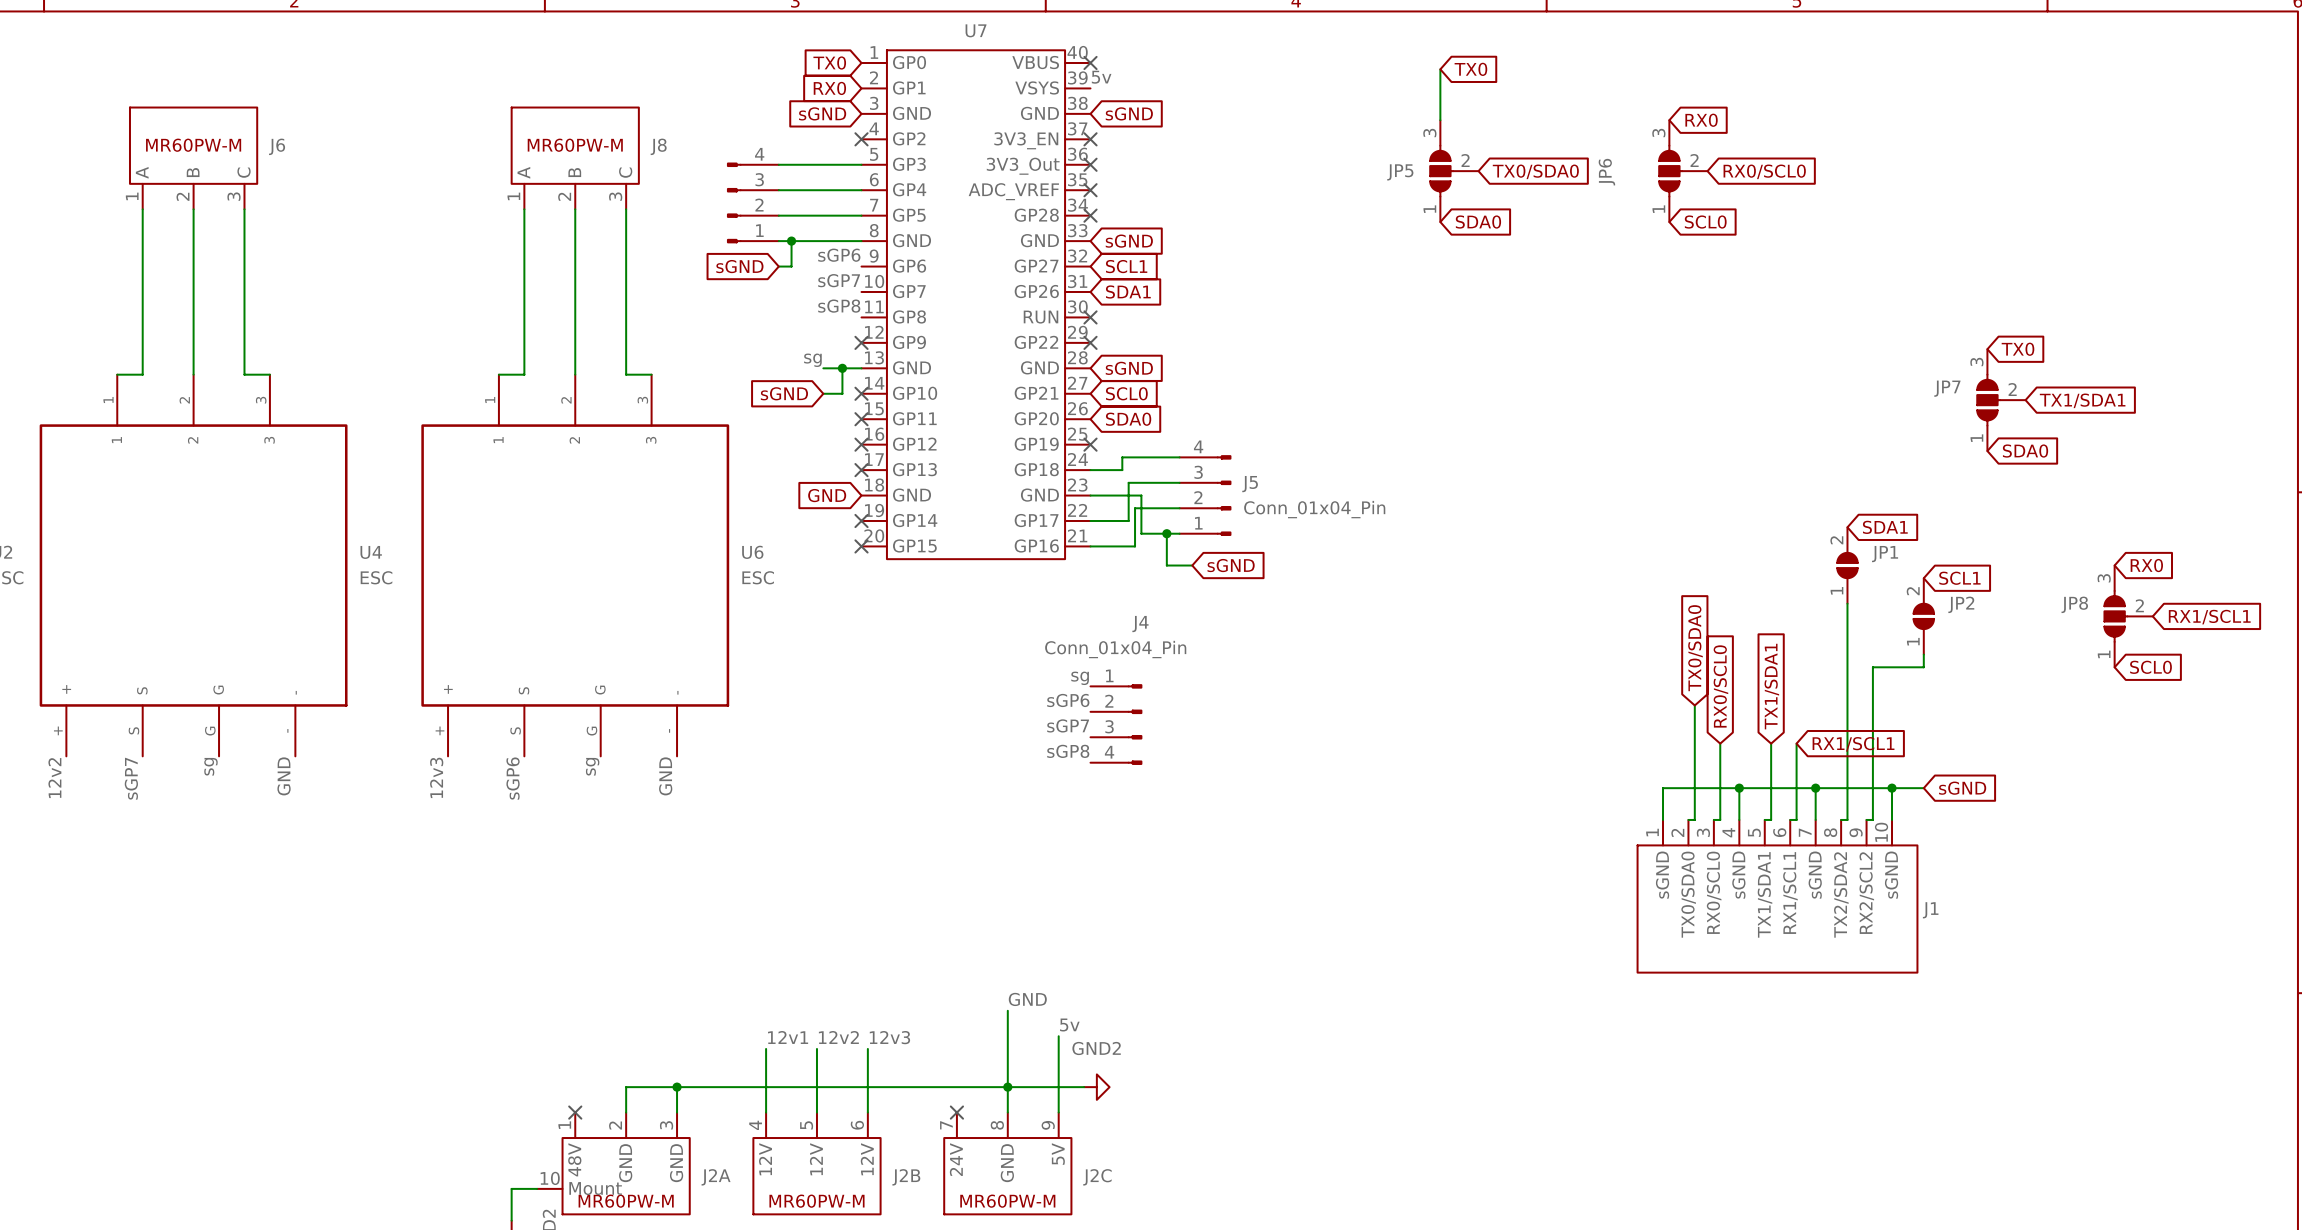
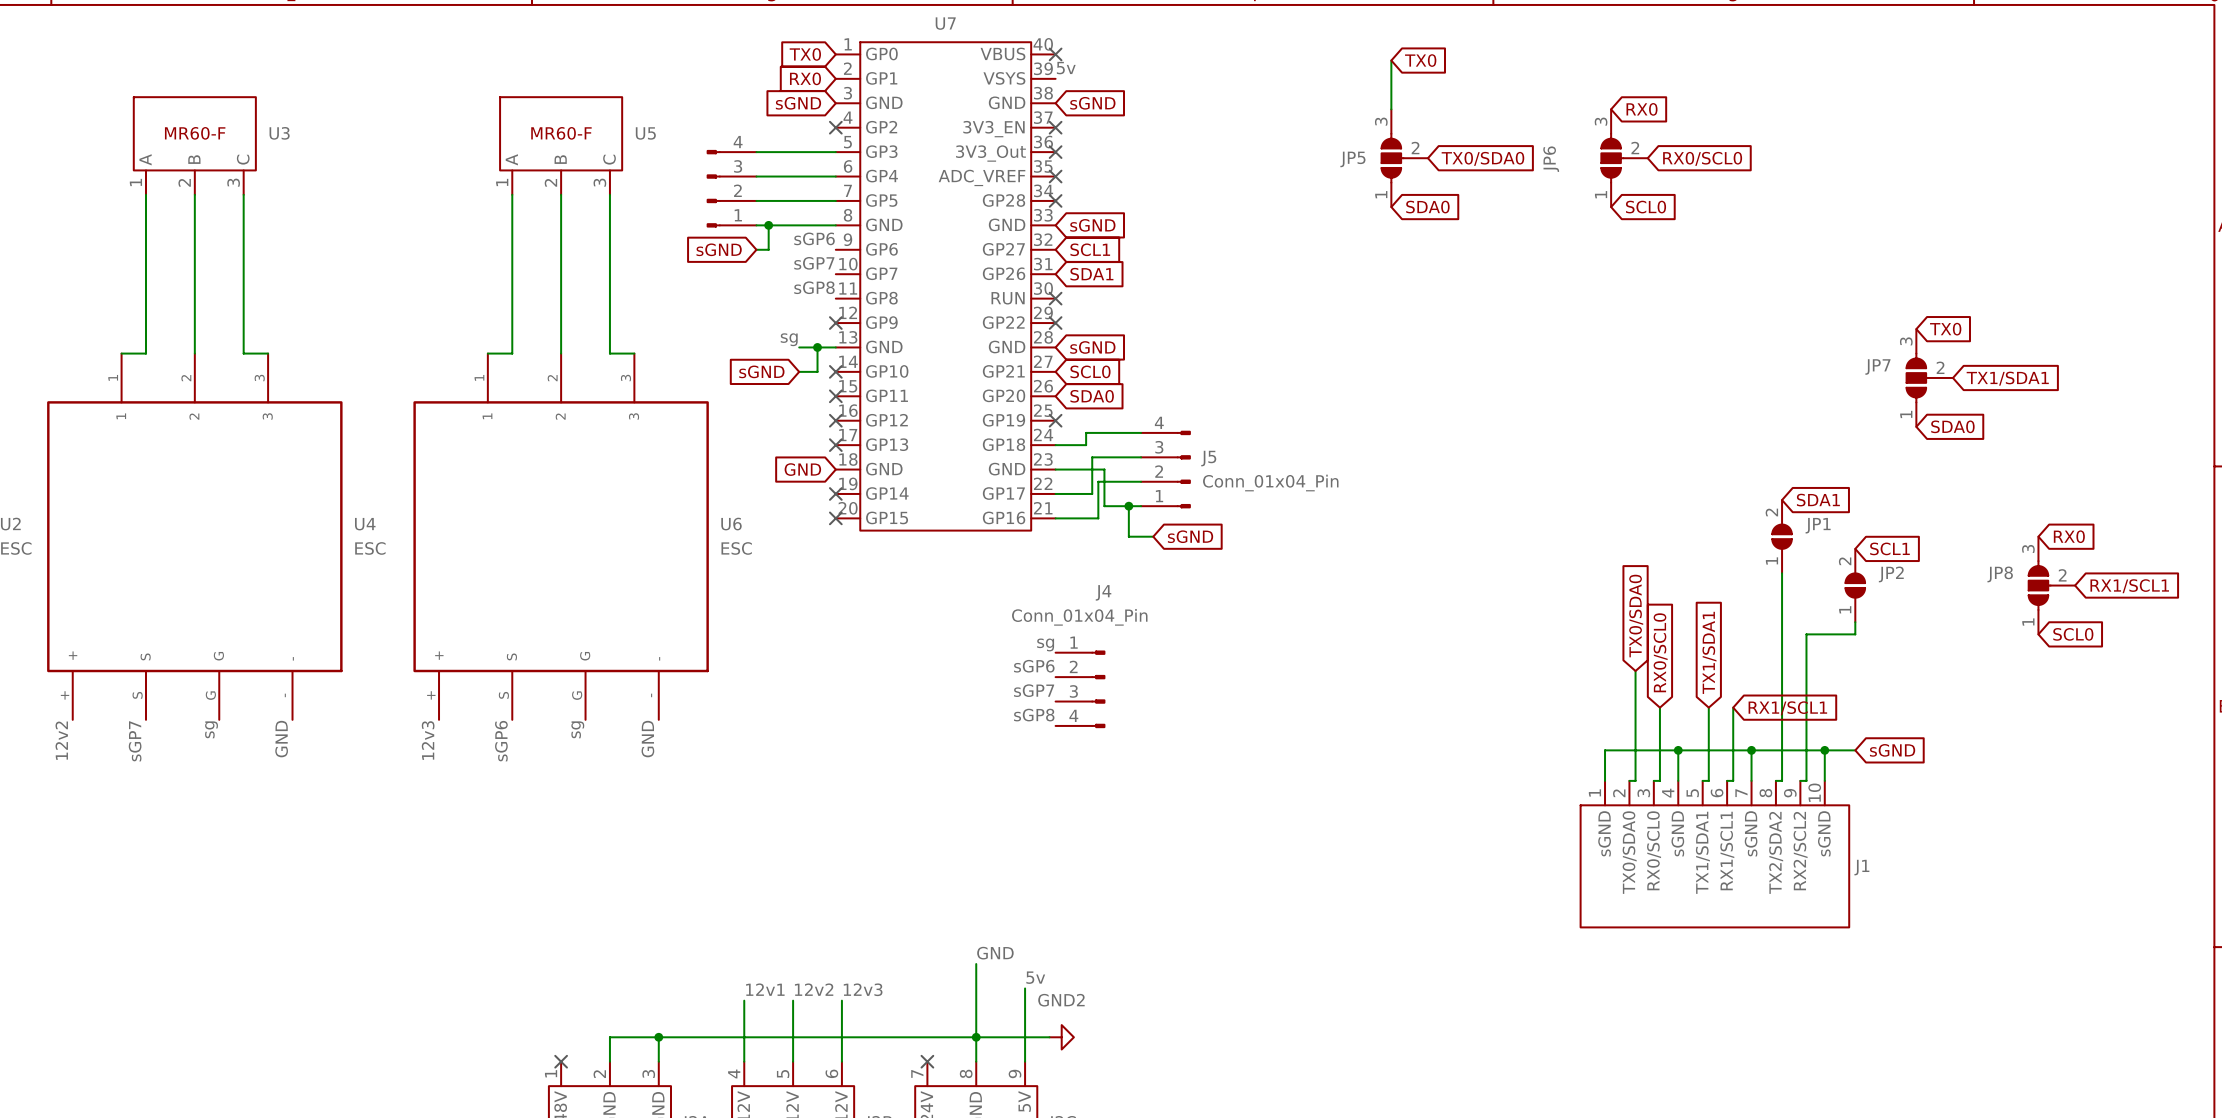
J6 text: MR60PW-M (193, 145) -> MR60-F (195, 133)
J8 text: MR60PW-M (575, 145) -> MR60-F (561, 133)
J6 name: J6 (277, 146) -> U3 (279, 133)
J8 name: J8 (658, 146) -> U5 (645, 133)

